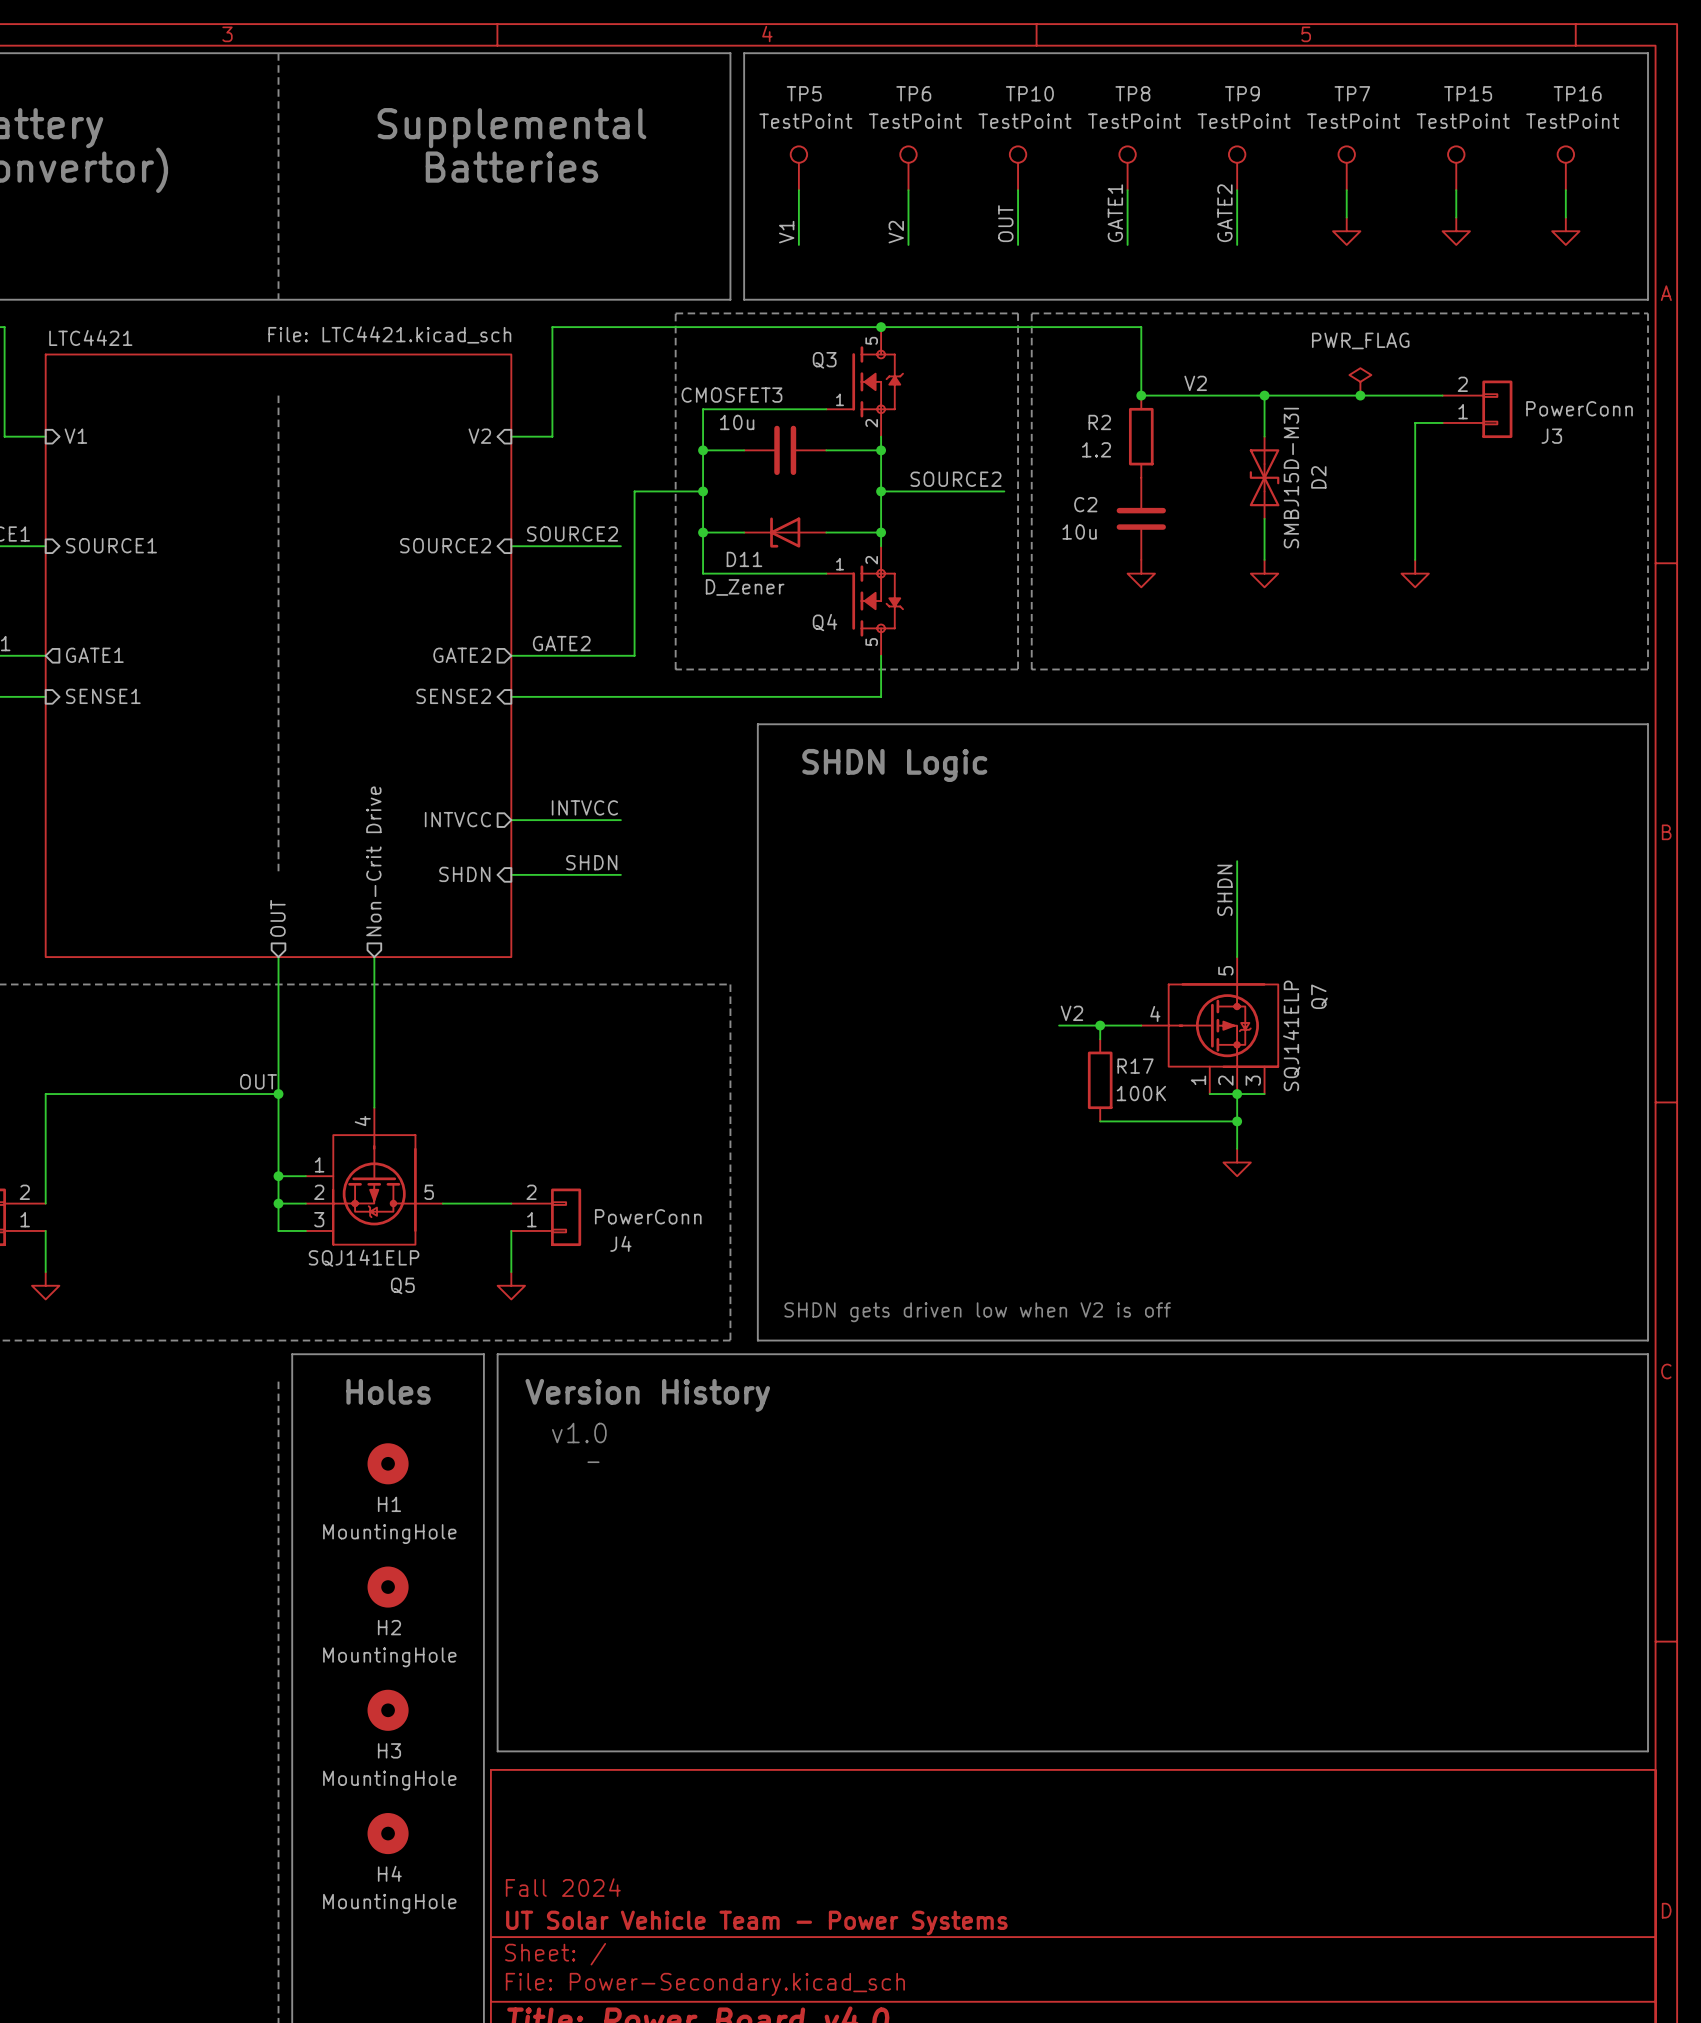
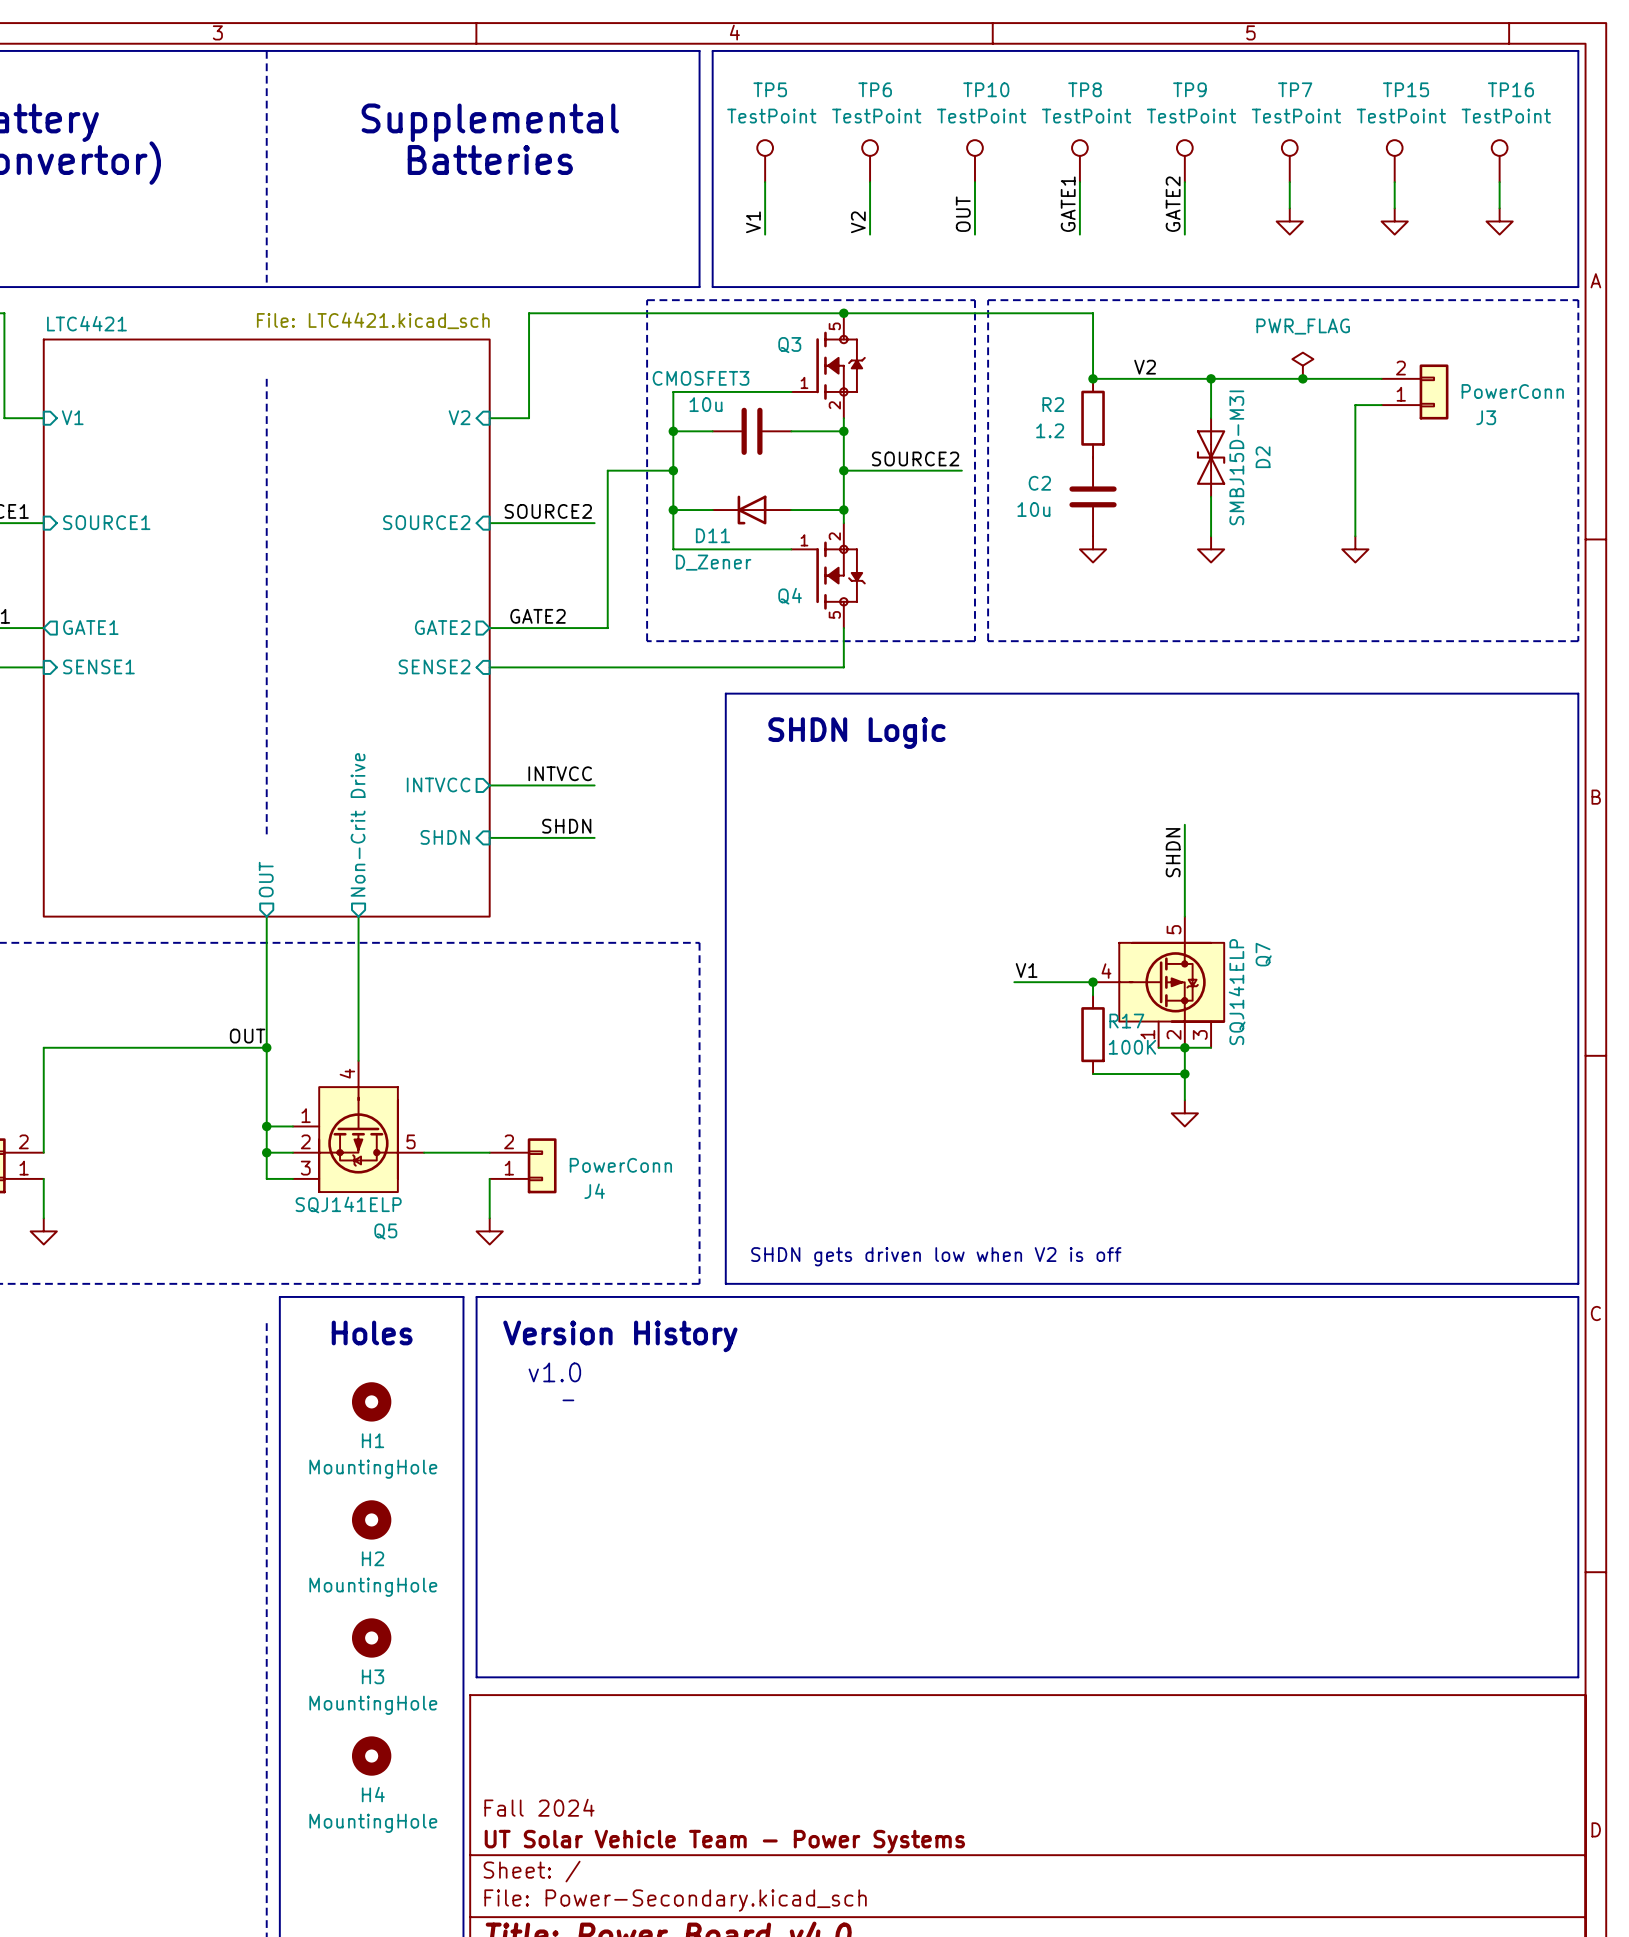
label: V2 (1071, 1013) -> V1 (1026, 970)
wire: (1100, 1025) (1100, 1039) -> (1093, 982) (1093, 995)
junction position: (1100, 1025) -> (1093, 982)
R17 position: (1100, 1080) -> (1093, 1034)
wire: (1100, 1121) (1141, 1121) -> none

